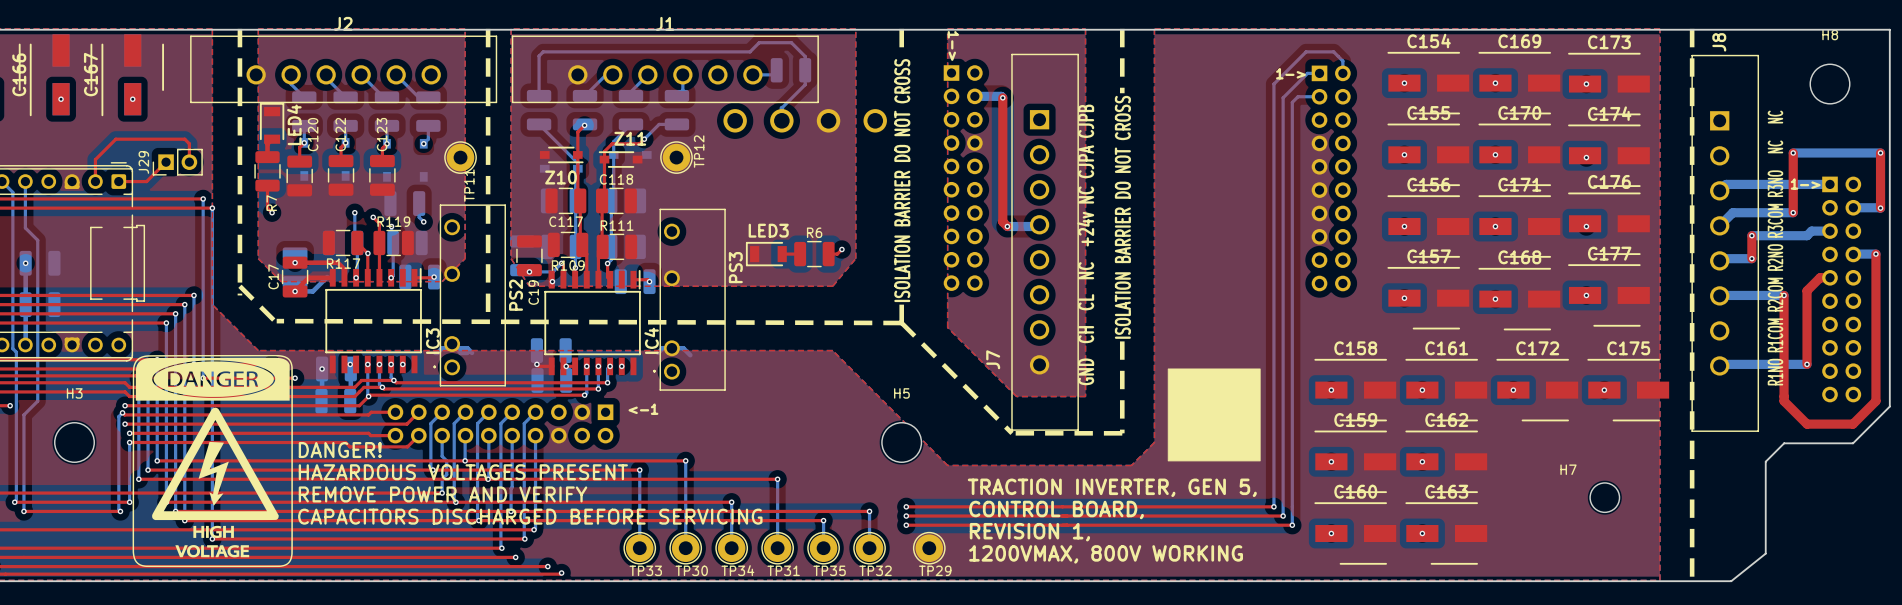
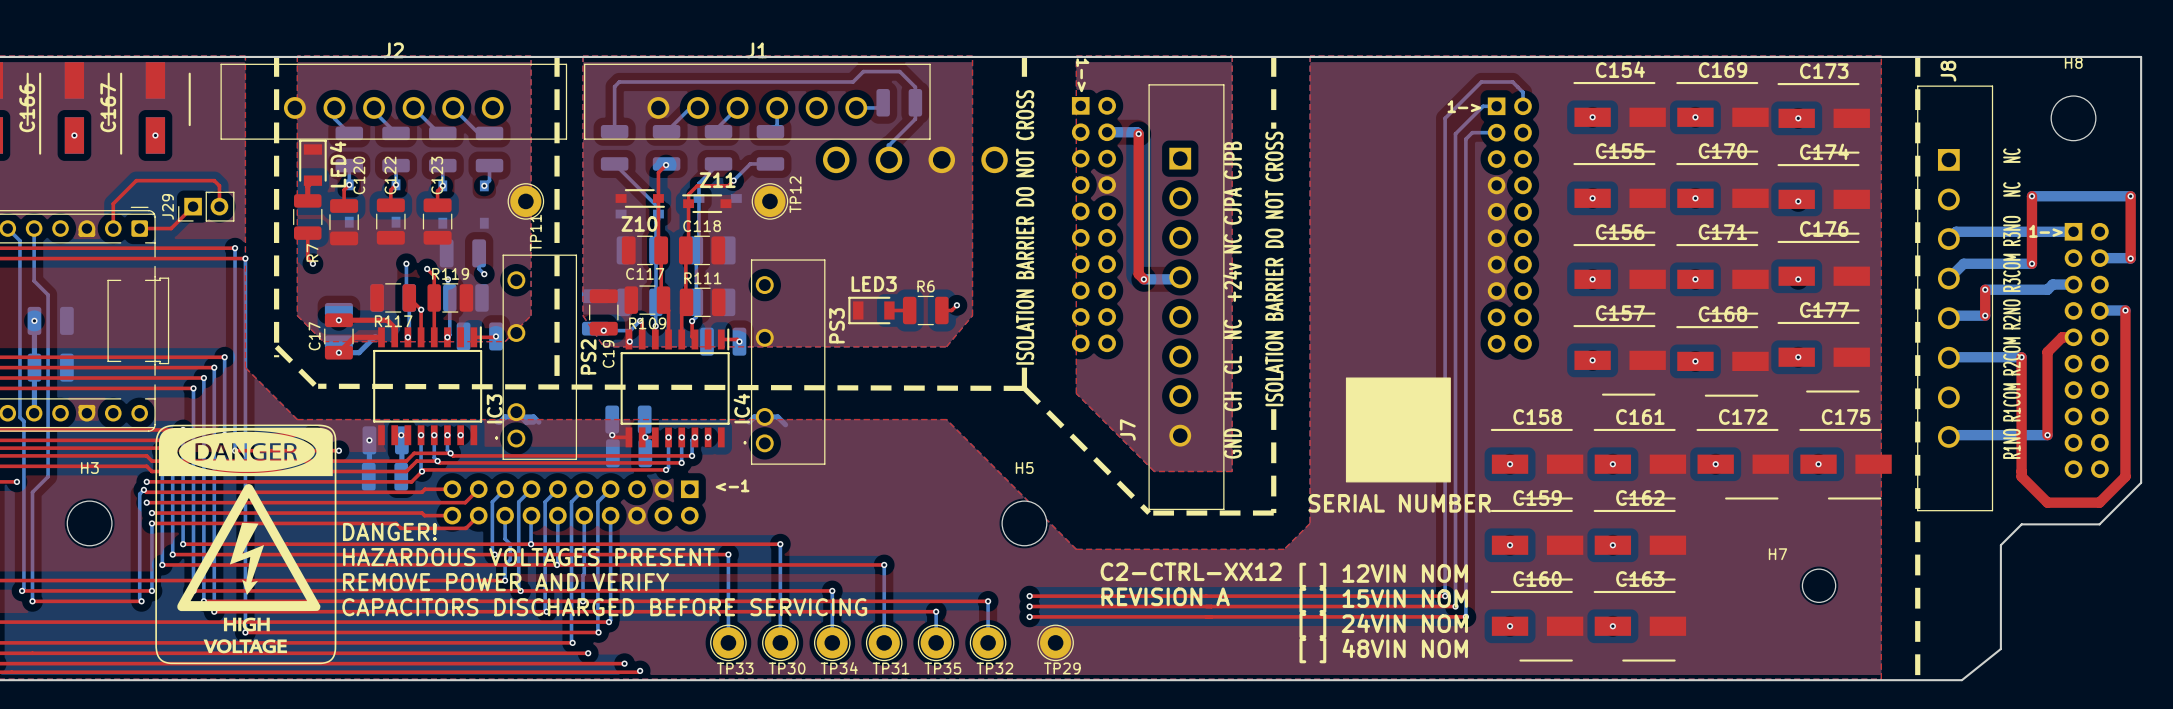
drawing position: (1214, 414) -> (1398, 429)
text: none -> SERIAL NUMBER (1399, 503)
text: TRACTION INVERTER, GEN 5, (1112, 487) -> C2-CTRL-XX12 (1191, 571)
text: none -> [ ] 12VIN NOM (1383, 575)
text: CONTROL BOARD, (1056, 510) -> REVISION A (1165, 596)
text: none -> [ ] 15VIN NOM (1383, 600)
text: REVISION 1, (1029, 532) -> none
text: none -> [ ] 24VIN NOM (1383, 625)
text: 1200VMAX, 800V WORKING (1106, 554) -> none
text: none -> [ ] 48VIN NOM (1383, 650)

